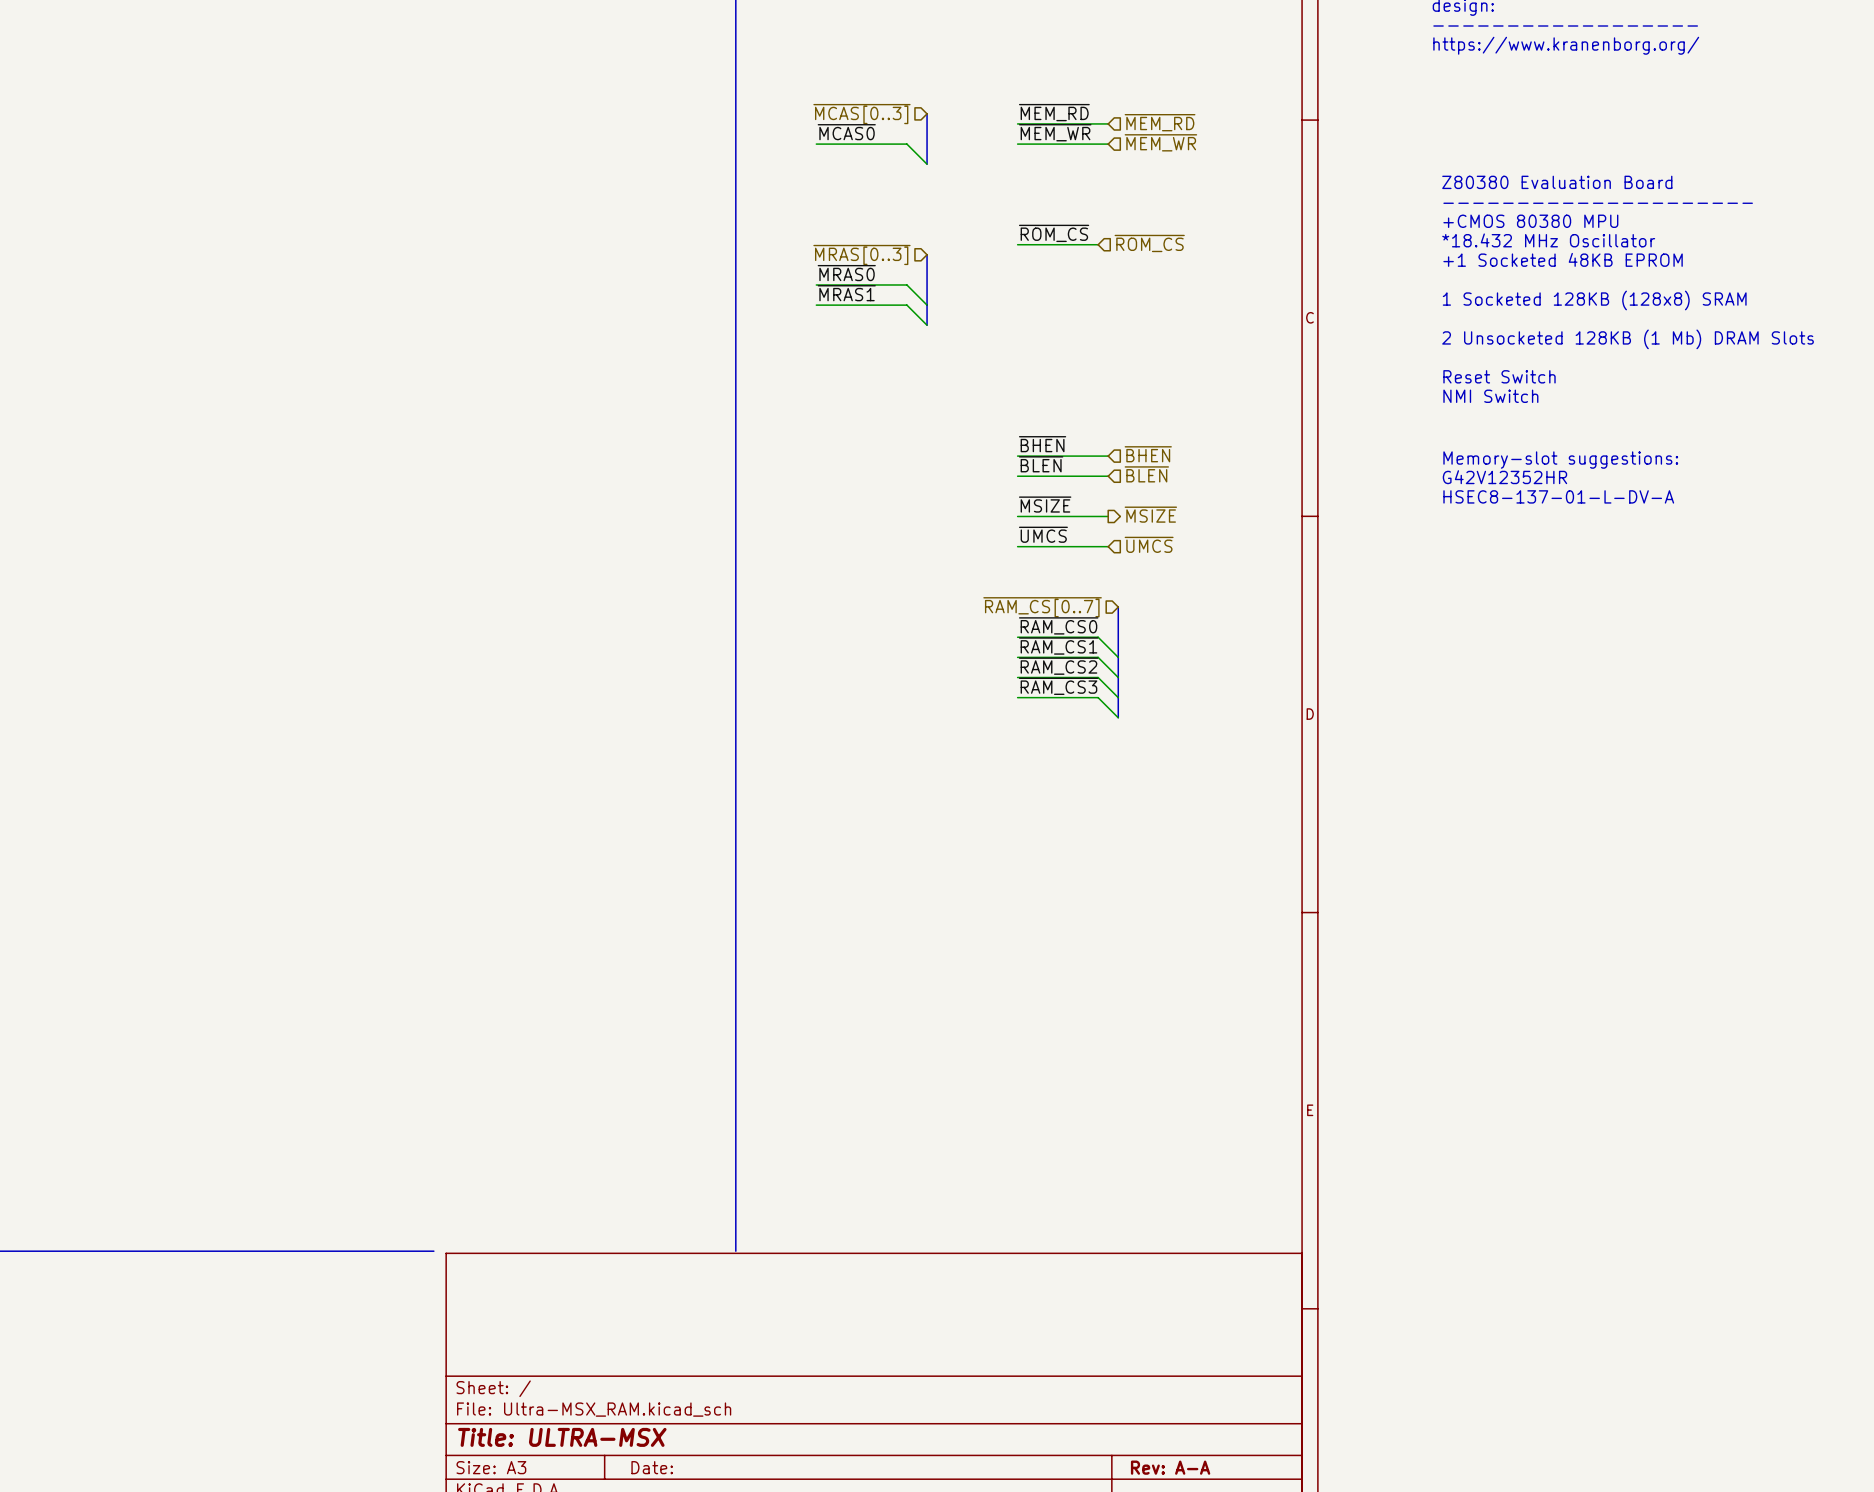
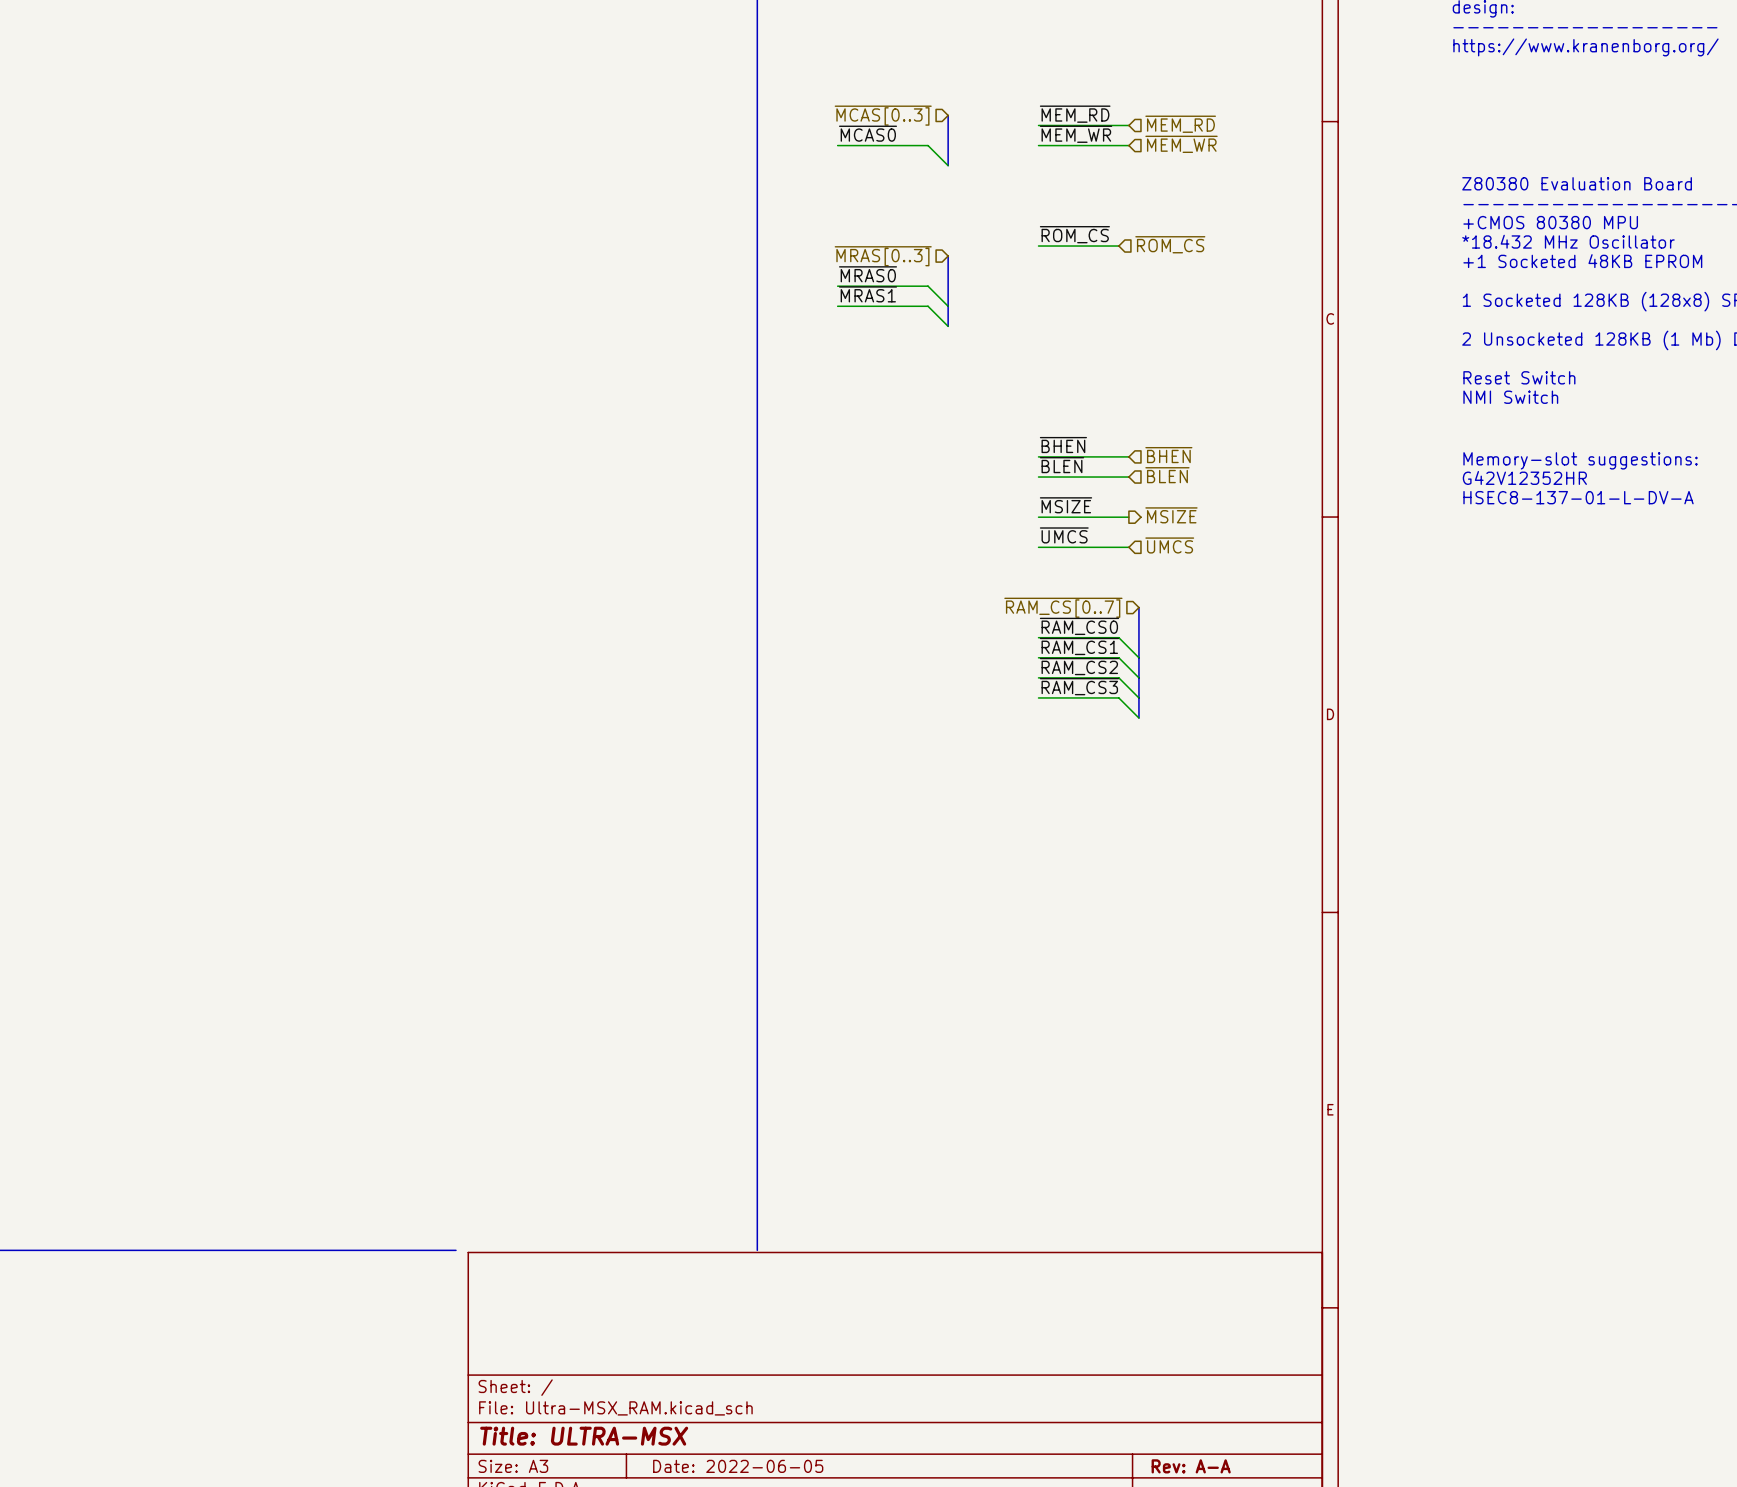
title block: Date: (652, 1467) -> Date: 2022-06-05 (738, 1466)

